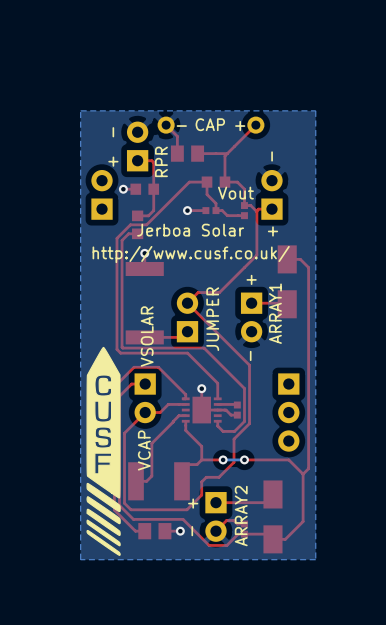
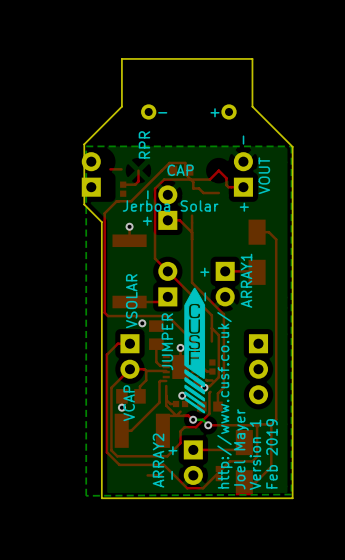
board edge: none -> (252, 58) (252, 106) (292, 146) (292, 498) (101, 498) (101, 222) (84, 204) (84, 144) (121, 106) (121, 58) (252, 58)
bottom zone outline: (315, 110) (315, 559) (80, 559) (80, 110) (315, 110) -> (291, 146) (291, 494) (86, 495) (86, 146) (291, 146)
text position: CAP (210, 124) -> CAP (180, 170)
top track: (166, 125) (177, 136) (177, 153) -> none
top track: (255, 125) (224, 156) (224, 182) (237, 182) (244, 189) (244, 205) (250, 205) (256, 211) -> none
text: - (113, 132) -> none
part position: (137, 146) -> (167, 207)
part: (187, 153) -> none
top track: (227, 153) (197, 153) -> none
top track: (137, 160) (151, 160) (153, 162) (153, 210) (148, 215) (137, 215) -> none
text: + (113, 161) -> none
part position: (215, 182) -> (180, 170)
via: (123, 189) -> none
part: (144, 189) -> none
top track: none -> (138, 170) (138, 181) (135, 184) (123, 184)
text: Vout (235, 193) -> none
text: none -> VOUT (264, 175)
top track: (258, 209) (256, 210) (256, 255) (219, 292) (198, 292) (187, 303) -> (231, 187) (226, 185) (226, 178) (218, 170) (209, 179) (164, 179) (155, 188) (155, 258) (167, 271)
via: (187, 210) -> none
top track: (205, 210) (187, 210) -> none
part: (210, 210) -> none
part: (244, 210) -> none
part: none -> (123, 189)
text: none -> - (147, 194)
part: (137, 224) -> none
top track: (137, 233) (128, 233) (122, 240) (122, 347) (204, 348) (244, 388) -> (211, 328) (218, 335) (218, 347)
top track: none -> (172, 215) (167, 220) (179, 220) (192, 232)
top track: none -> (192, 215) (192, 282) (223, 314) (223, 387) (217, 393) (217, 406)
text: none -> + (147, 221)
text: http://www.cusf.co.uk/ (191, 254) -> none
text position: + (251, 279) -> + (204, 272)
text position: JUMPER (212, 319) -> JUMPER (167, 341)
drawing: none -> [184, 287, 206, 414]
drawing: [86, 346, 121, 556] -> none
top track: (236, 352) (249, 365) (249, 423) (235, 437) -> (211, 315) (211, 341)
text position: - (250, 355) -> - (205, 296)
via: none -> (142, 323)
part: none -> (156, 335)
top track: none -> (160, 347) (156, 344) (156, 362) (160, 365) (166, 365)
top track: (183, 398) (185, 398) (185, 394) (158, 367) (134, 367) (114, 386) (114, 510) (135, 531) (144, 531) -> none
top track: (185, 404) (168, 404) (160, 412) -> (146, 370) (143, 369)
top track: (217, 404) (237, 405) -> none
top track: none -> (146, 370) (146, 380) (139, 386) (139, 396)
top track: none -> (166, 370) (146, 370)
top track: (185, 415) (179, 415) (151, 443) (151, 476) -> (166, 380) (159, 381) (159, 402) (135, 426)
top track: (185, 421) (185, 430) (201, 446) (201, 459) (223, 459) -> none
top track: none -> (206, 379) (212, 380)
top track: none -> (166, 385) (166, 405) (176, 415) (188, 415) (193, 419)
via: none -> (204, 387)
part: none -> (130, 396)
via: none -> (182, 395)
top track: none -> (166, 399) (170, 404) (176, 404)
text: none -> http://www.cusf.co.uk/ (224, 400)
part: none -> (180, 404)
part: none -> (209, 406)
via: none -> (121, 407)
via: (223, 459) -> none
top track: (244, 459) (288, 459) (303, 474) -> (257, 426) (259, 424) (271, 424)
bottom track: (244, 459) (223, 459) -> none
via: (244, 459) -> none
bottom track: none -> (193, 419) (202, 419) (208, 425)
via: none -> (193, 419)
via: none -> (208, 425)
top track: none -> (258, 425) (208, 425)
text: none -> Joel Mayer (241, 449)
text: none -> Feb 2019 (272, 453)
text: none -> Version 1 (255, 454)
text position: ARRAY2 (241, 516) -> ARRAY2 (158, 460)
top track: (244, 524) (226, 520) (215, 531) -> none
part: (154, 531) -> none
via: (180, 531) -> none
top track: (267, 534) (238, 534) -> (257, 426) (257, 456) (252, 461) (229, 461) (213, 478)

